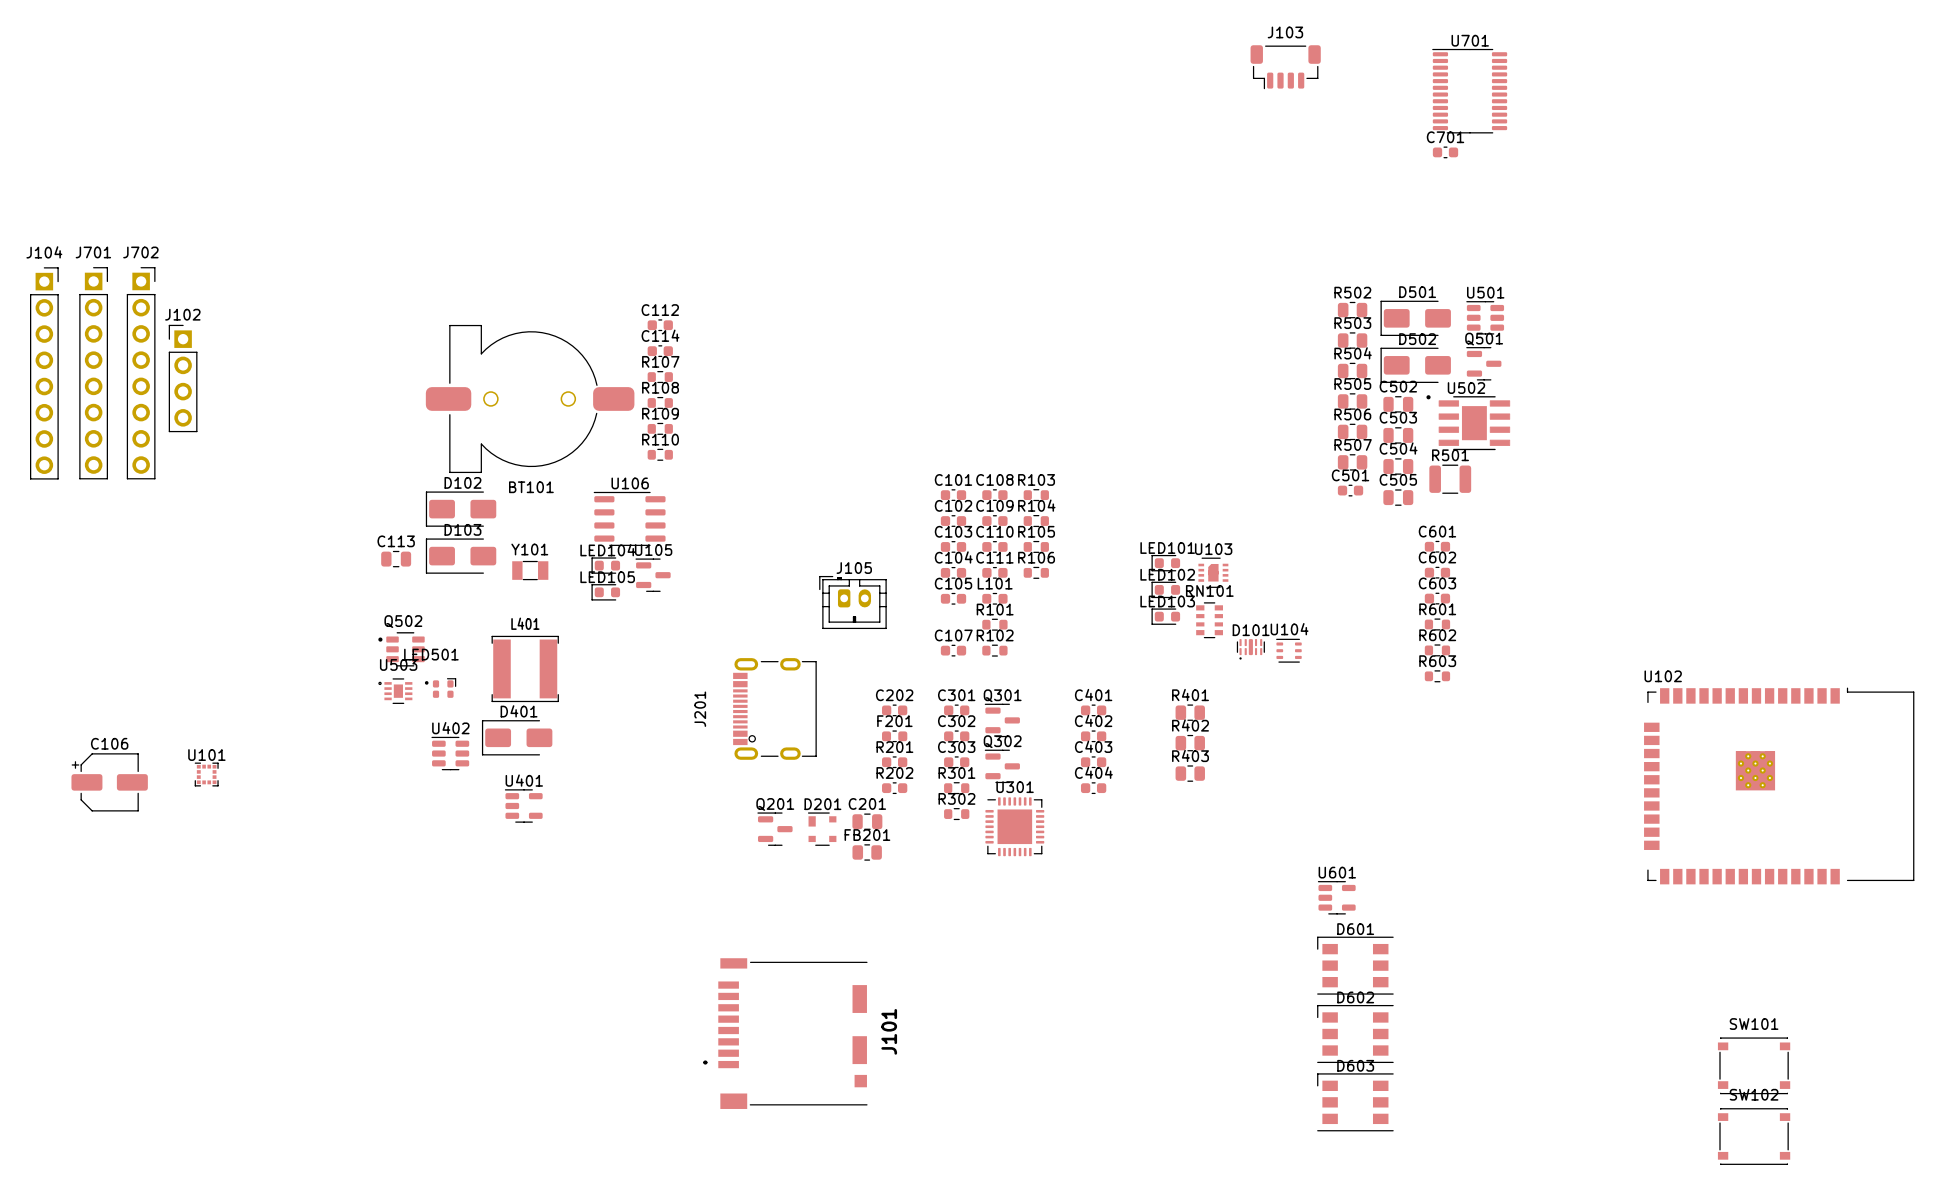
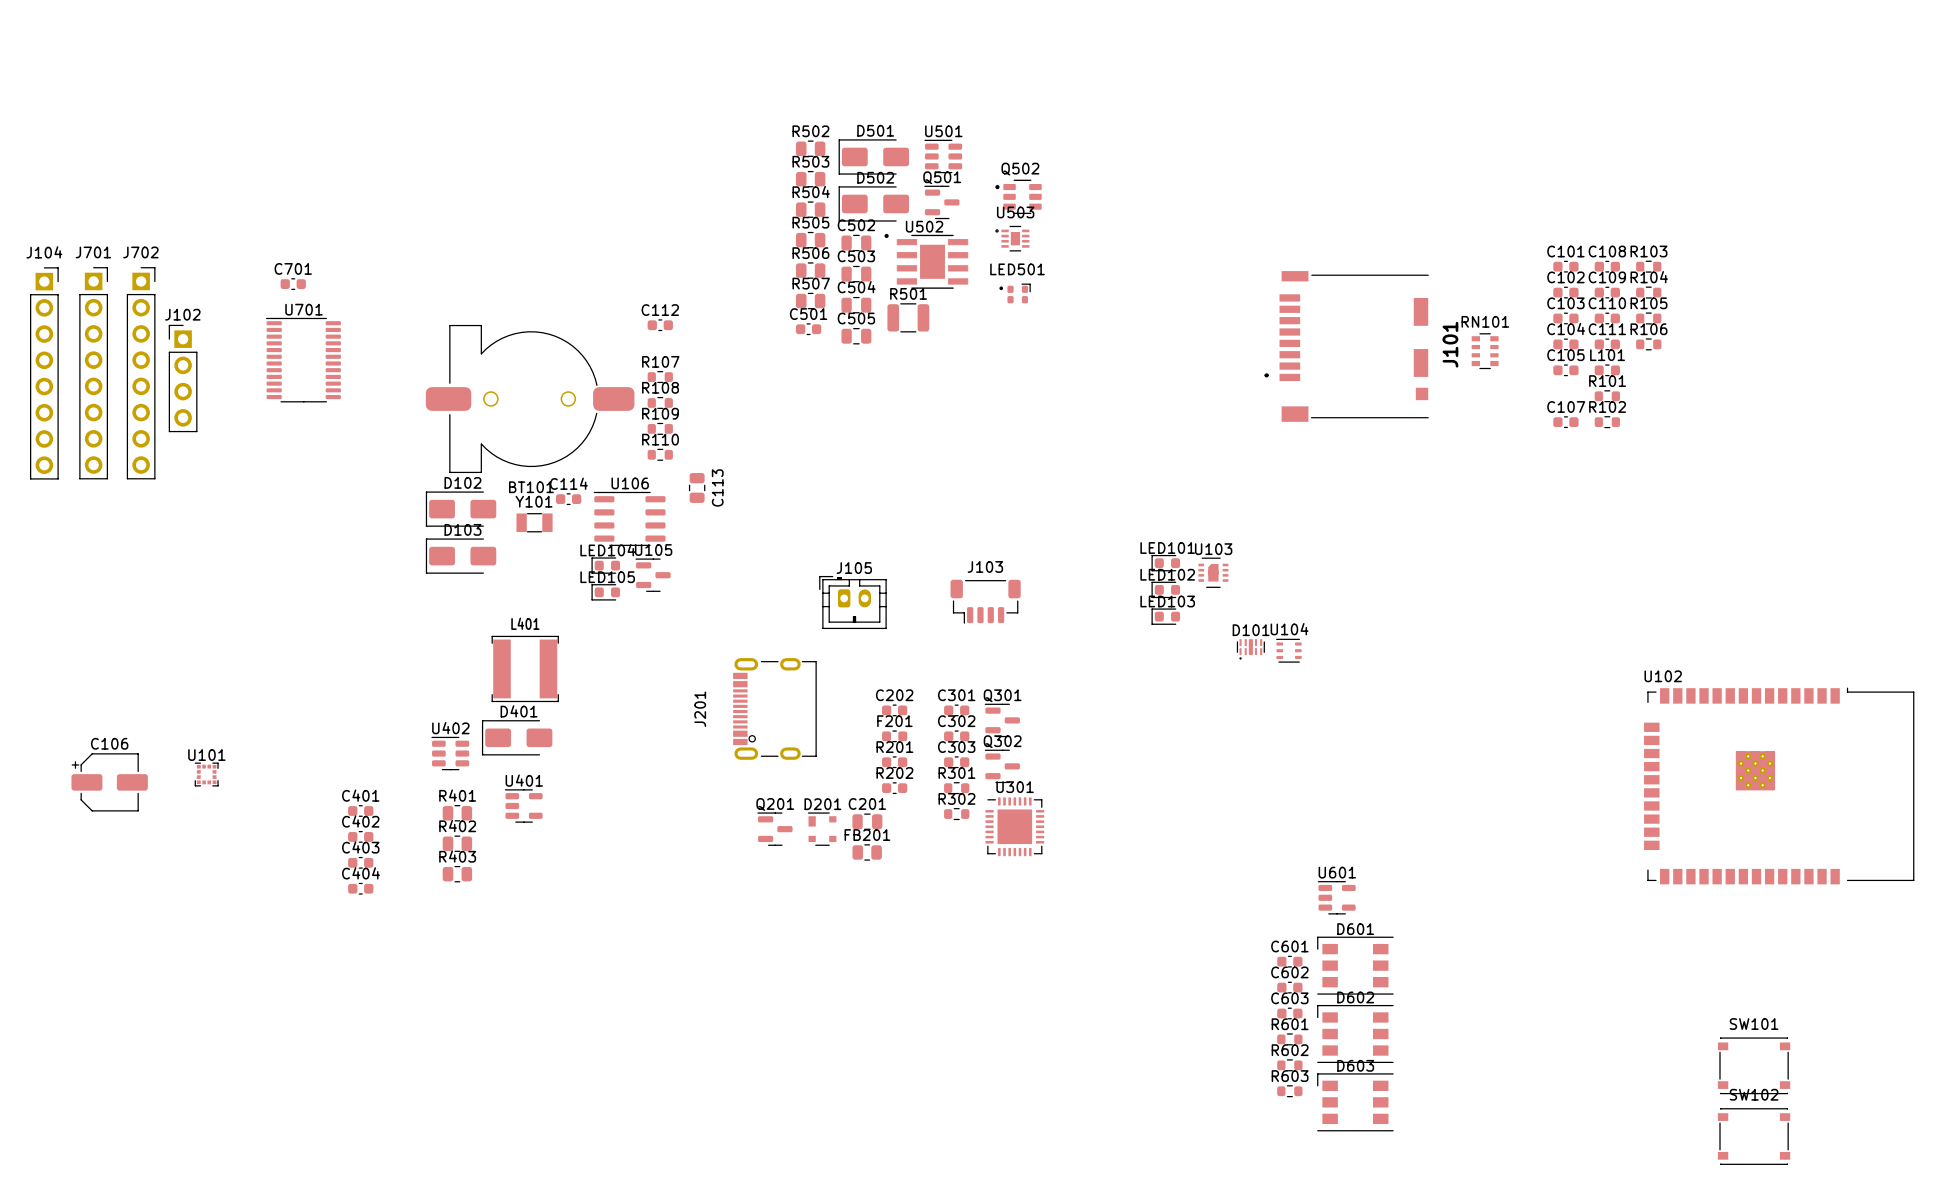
J103 position: (1285, 67) -> (985, 601)
U701 position: (1469, 91) -> (303, 360)
C701 position: (1445, 152) -> (293, 284)
R502 position: (1352, 310) -> (810, 148)
U501 position: (1485, 317) -> (943, 156)
D501 position: (1415, 318) -> (873, 156)
R503 position: (1352, 340) -> (810, 179)
C114 position: (660, 351) -> (568, 499)
Q501 position: (1483, 363) -> (941, 202)
D502 position: (1415, 365) -> (873, 203)
R504 position: (1352, 371) -> (810, 209)
R505 position: (1352, 401) -> (810, 240)
C502 position: (1398, 404) -> (856, 242)
U502 position: (1468, 422) -> (926, 261)
R506 position: (1352, 431) -> (810, 270)
C503 position: (1398, 435) -> (856, 274)
R507 position: (1352, 462) -> (810, 301)
C504 position: (1398, 466) -> (856, 305)
R501 position: (1450, 479) -> (908, 317)
C501 position: (1350, 490) -> (808, 329)
C101 position: (953, 495) -> (1565, 266)
C108 position: (994, 495) -> (1607, 266)
R103 position: (1036, 495) -> (1648, 266)
C505 position: (1398, 497) -> (856, 336)
C102 position: (953, 521) -> (1565, 292)
C109 position: (994, 521) -> (1607, 292)
R104 position: (1036, 521) -> (1648, 292)
C103 position: (953, 546) -> (1565, 318)
C110 position: (994, 546) -> (1607, 318)
R105 position: (1036, 546) -> (1648, 318)
C601 position: (1437, 546) -> (1289, 961)
C113 rotation: 0° (396, 559) -> 90° clockwise (697, 487)
C113 position: (396, 559) -> (697, 487)
Y101 position: (530, 570) -> (534, 522)
C104 position: (953, 572) -> (1565, 344)
C111 position: (994, 572) -> (1607, 344)
R106 position: (1036, 572) -> (1648, 344)
C602 position: (1437, 572) -> (1289, 987)
C105 position: (953, 598) -> (1565, 370)
L101 position: (994, 598) -> (1607, 370)
C603 position: (1437, 598) -> (1289, 1013)
RN101 position: (1209, 620) -> (1485, 351)
R101 position: (994, 624) -> (1607, 396)
R601 position: (1437, 624) -> (1289, 1039)
Q502 position: (401, 649) -> (1018, 196)
C107 position: (953, 650) -> (1565, 422)
R102 position: (994, 650) -> (1607, 422)
R602 position: (1437, 650) -> (1289, 1065)
LED501 name position: LED501 (431, 654) -> LED501 (1017, 269)
R603 position: (1437, 676) -> (1289, 1091)
LED501 position: (440, 688) -> (1015, 293)
U503 position: (395, 691) -> (1012, 238)
C401 position: (1093, 710) -> (360, 810)
R401 position: (1190, 712) -> (457, 813)
C402 position: (1093, 736) -> (360, 836)
R402 position: (1190, 743) -> (457, 843)
C403 position: (1093, 762) -> (360, 862)
R403 position: (1190, 773) -> (457, 874)
C404 position: (1093, 788) -> (360, 888)
J101 position: (785, 1033) -> (1346, 346)

